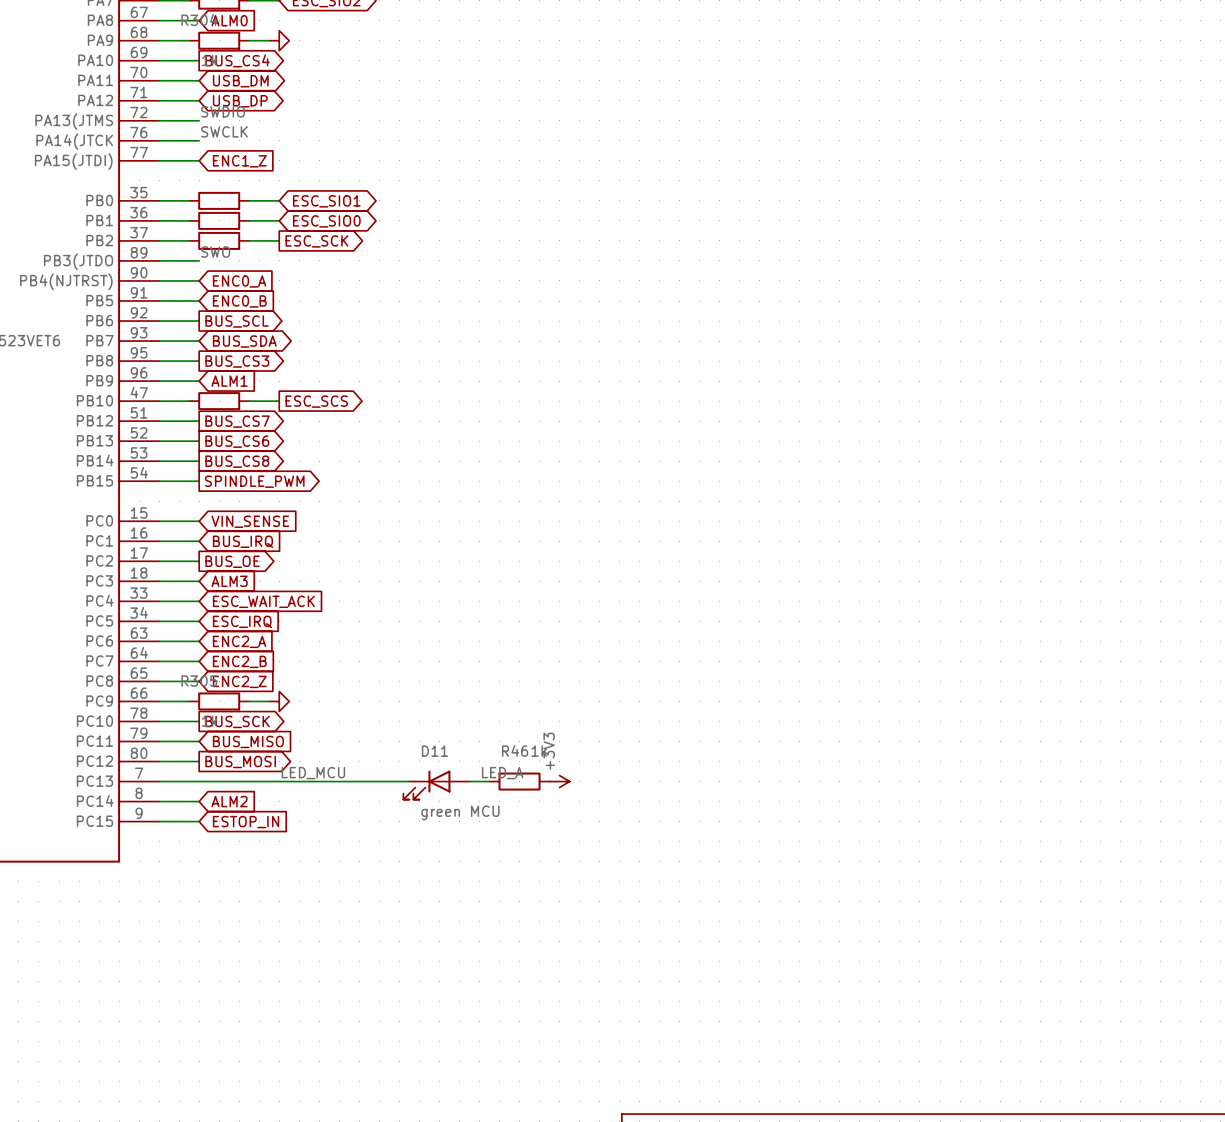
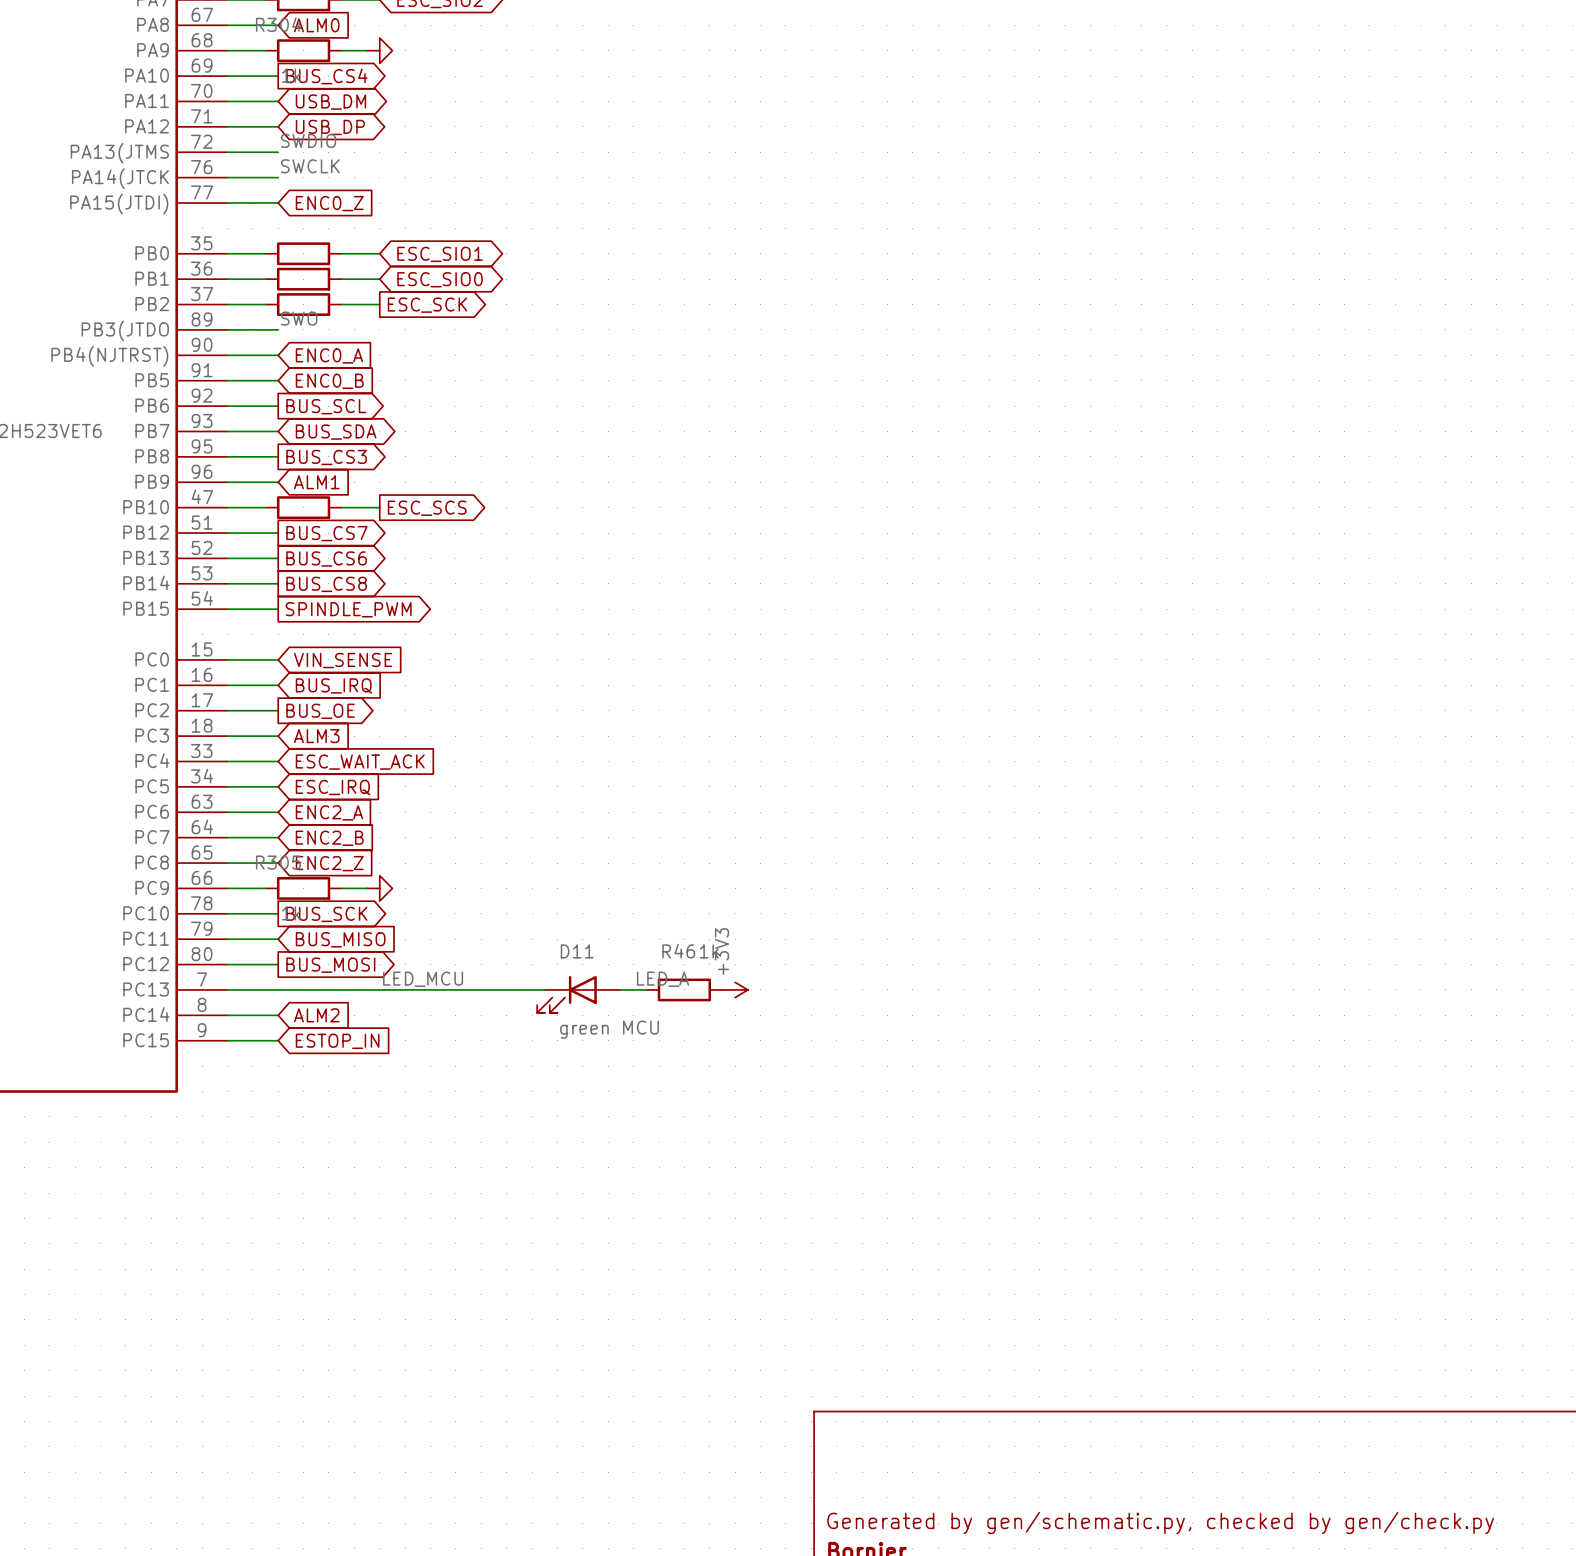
global label: ENC1_Z (239, 161) -> ENC0_Z (329, 203)

